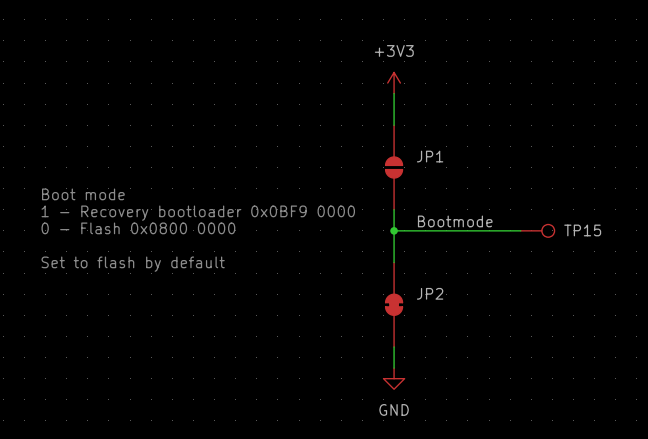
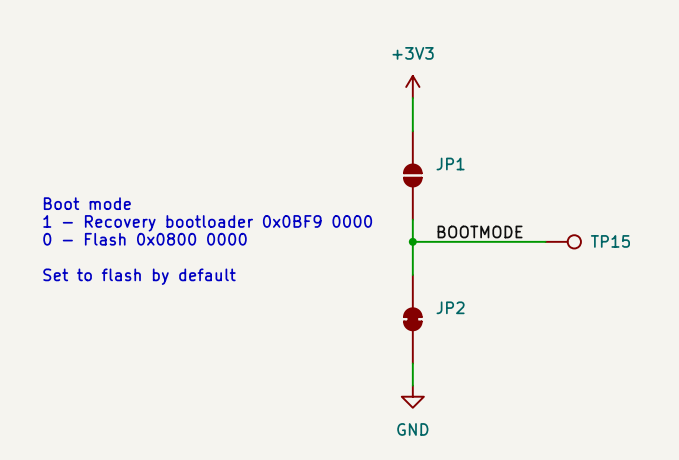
label: Bootmode (455, 221) -> BOOTMODE (480, 231)

